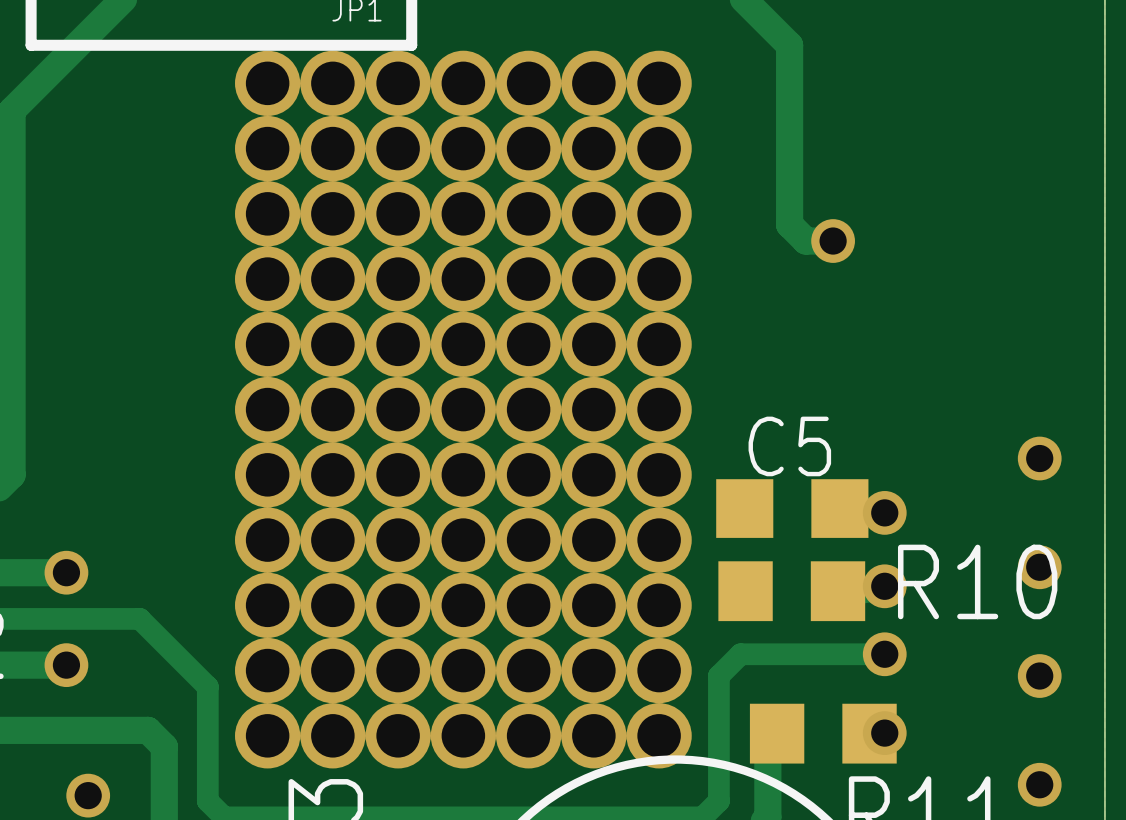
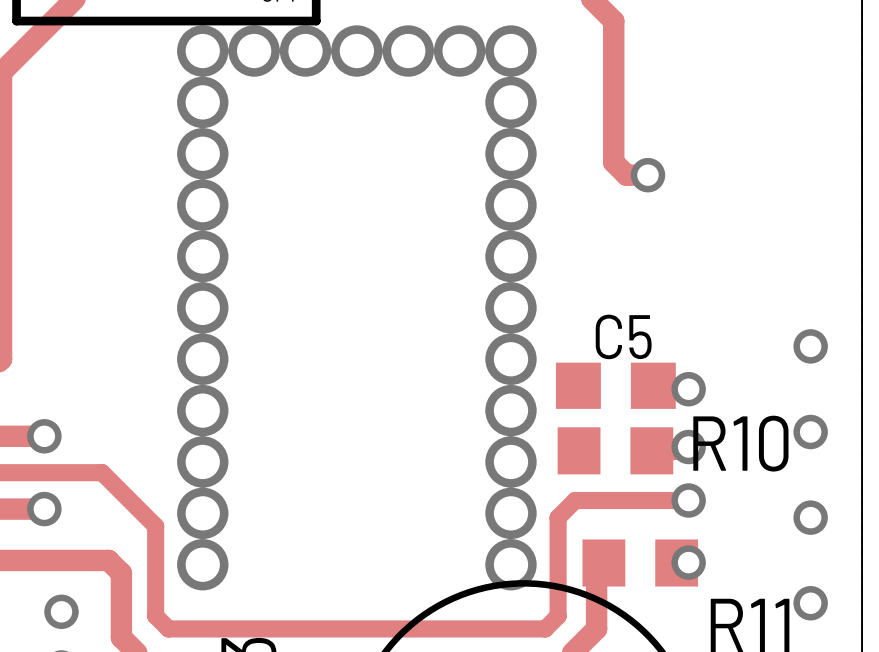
via: (332, 148) -> none
via: (398, 148) -> none
via: (463, 148) -> none
via: (528, 148) -> none
via: (593, 148) -> none
via: (332, 213) -> none
via: (398, 213) -> none
via: (463, 213) -> none
via: (528, 213) -> none
via: (593, 213) -> none
via: (332, 279) -> none
via: (398, 279) -> none
via: (463, 279) -> none
via: (528, 279) -> none
via: (593, 279) -> none
via: (332, 344) -> none
via: (398, 344) -> none
via: (463, 344) -> none
via: (528, 344) -> none
via: (593, 344) -> none
via: (332, 409) -> none
via: (398, 409) -> none
via: (463, 409) -> none
via: (528, 409) -> none
via: (593, 409) -> none
via: (332, 474) -> none
via: (398, 474) -> none
via: (463, 474) -> none
via: (528, 474) -> none
via: (593, 474) -> none
via: (332, 540) -> none
via: (398, 540) -> none
via: (463, 540) -> none
via: (528, 540) -> none
via: (593, 540) -> none
via: (332, 605) -> none
via: (398, 605) -> none
via: (463, 605) -> none
via: (528, 605) -> none
via: (593, 605) -> none
via: (332, 670) -> none
via: (398, 670) -> none
via: (463, 670) -> none
via: (528, 670) -> none
via: (593, 670) -> none
via: (332, 735) -> none
via: (398, 735) -> none
via: (463, 735) -> none
via: (528, 735) -> none
via: (593, 735) -> none

